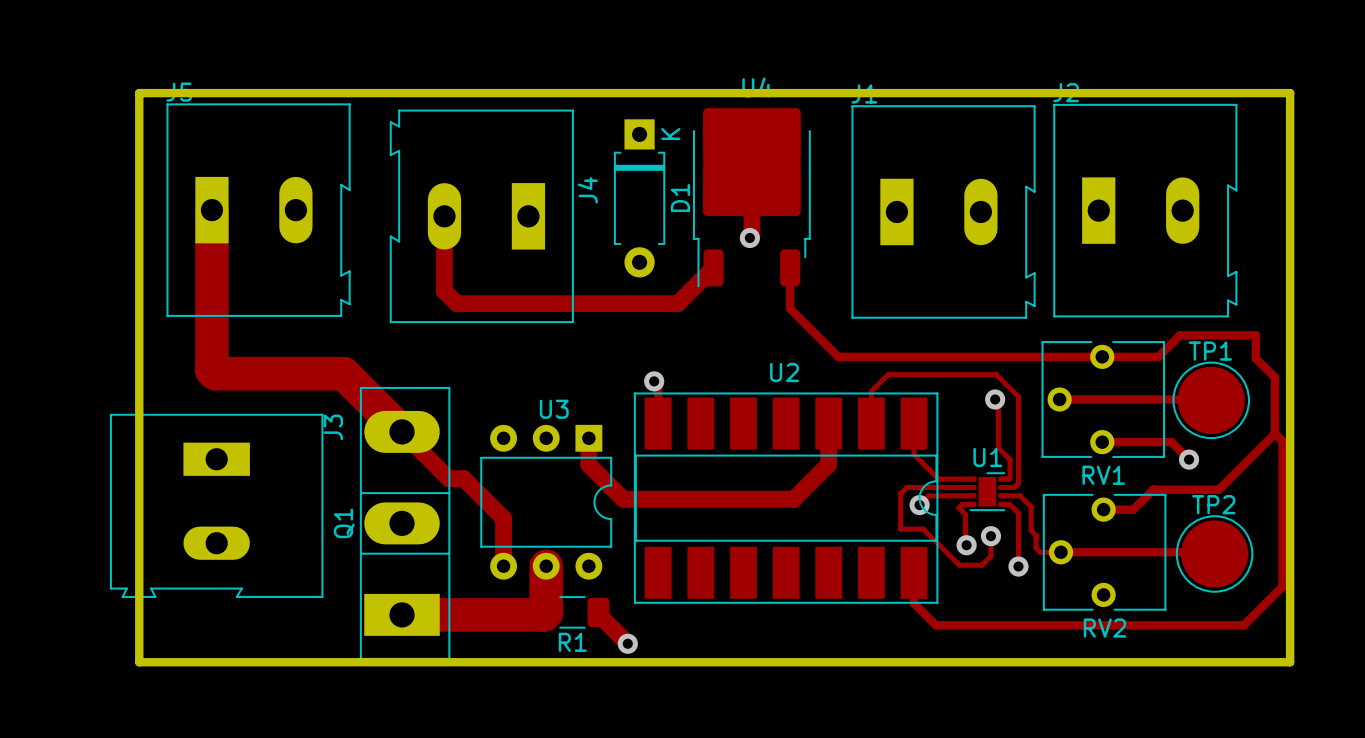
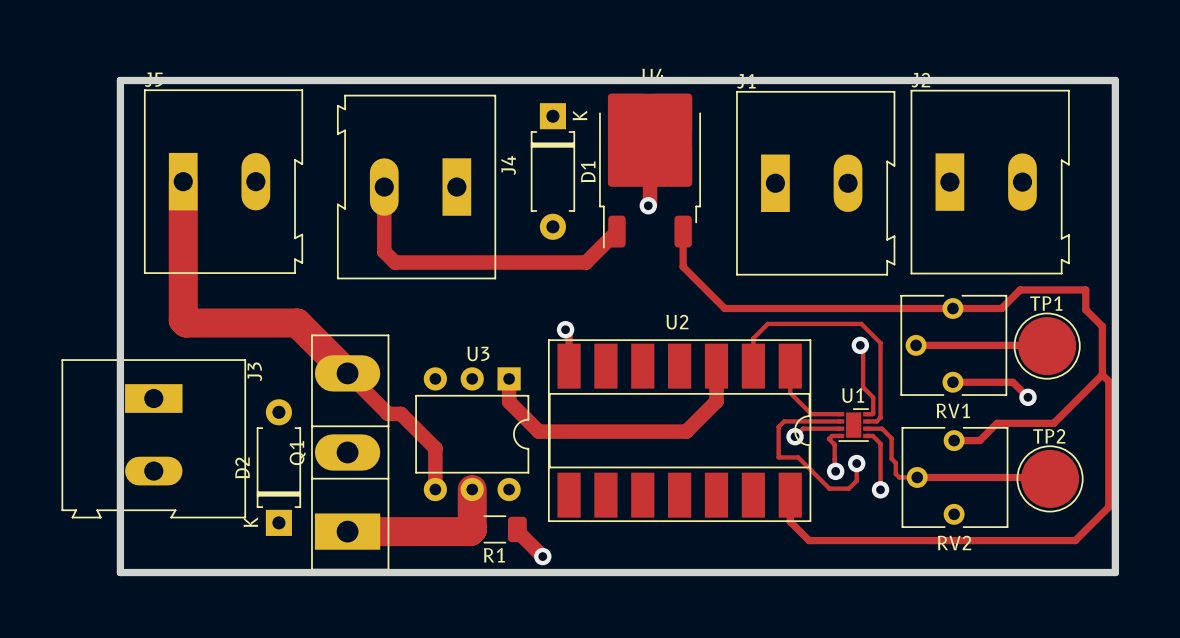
J3 position: (216, 505) -> (153, 438)
D2: none -> (278, 467)

